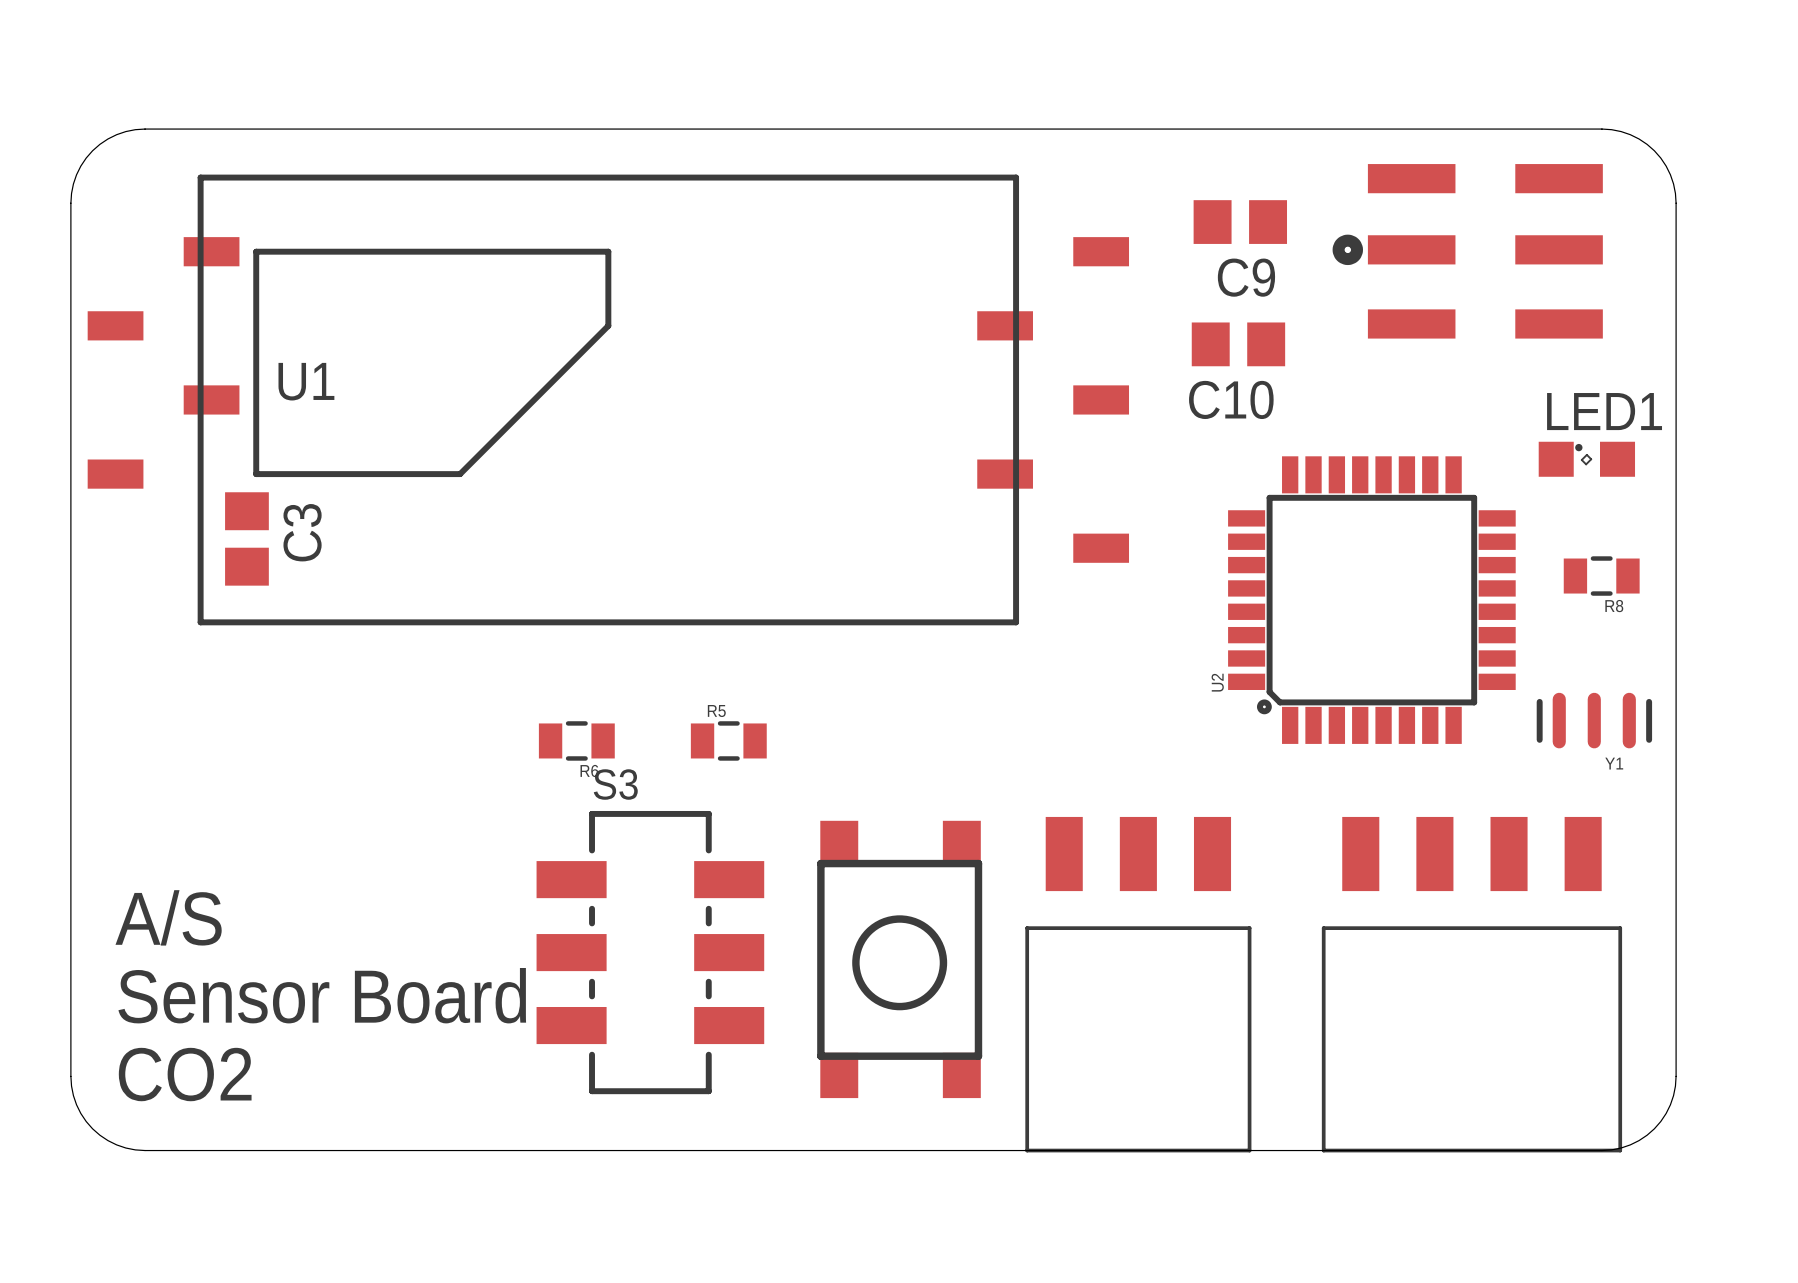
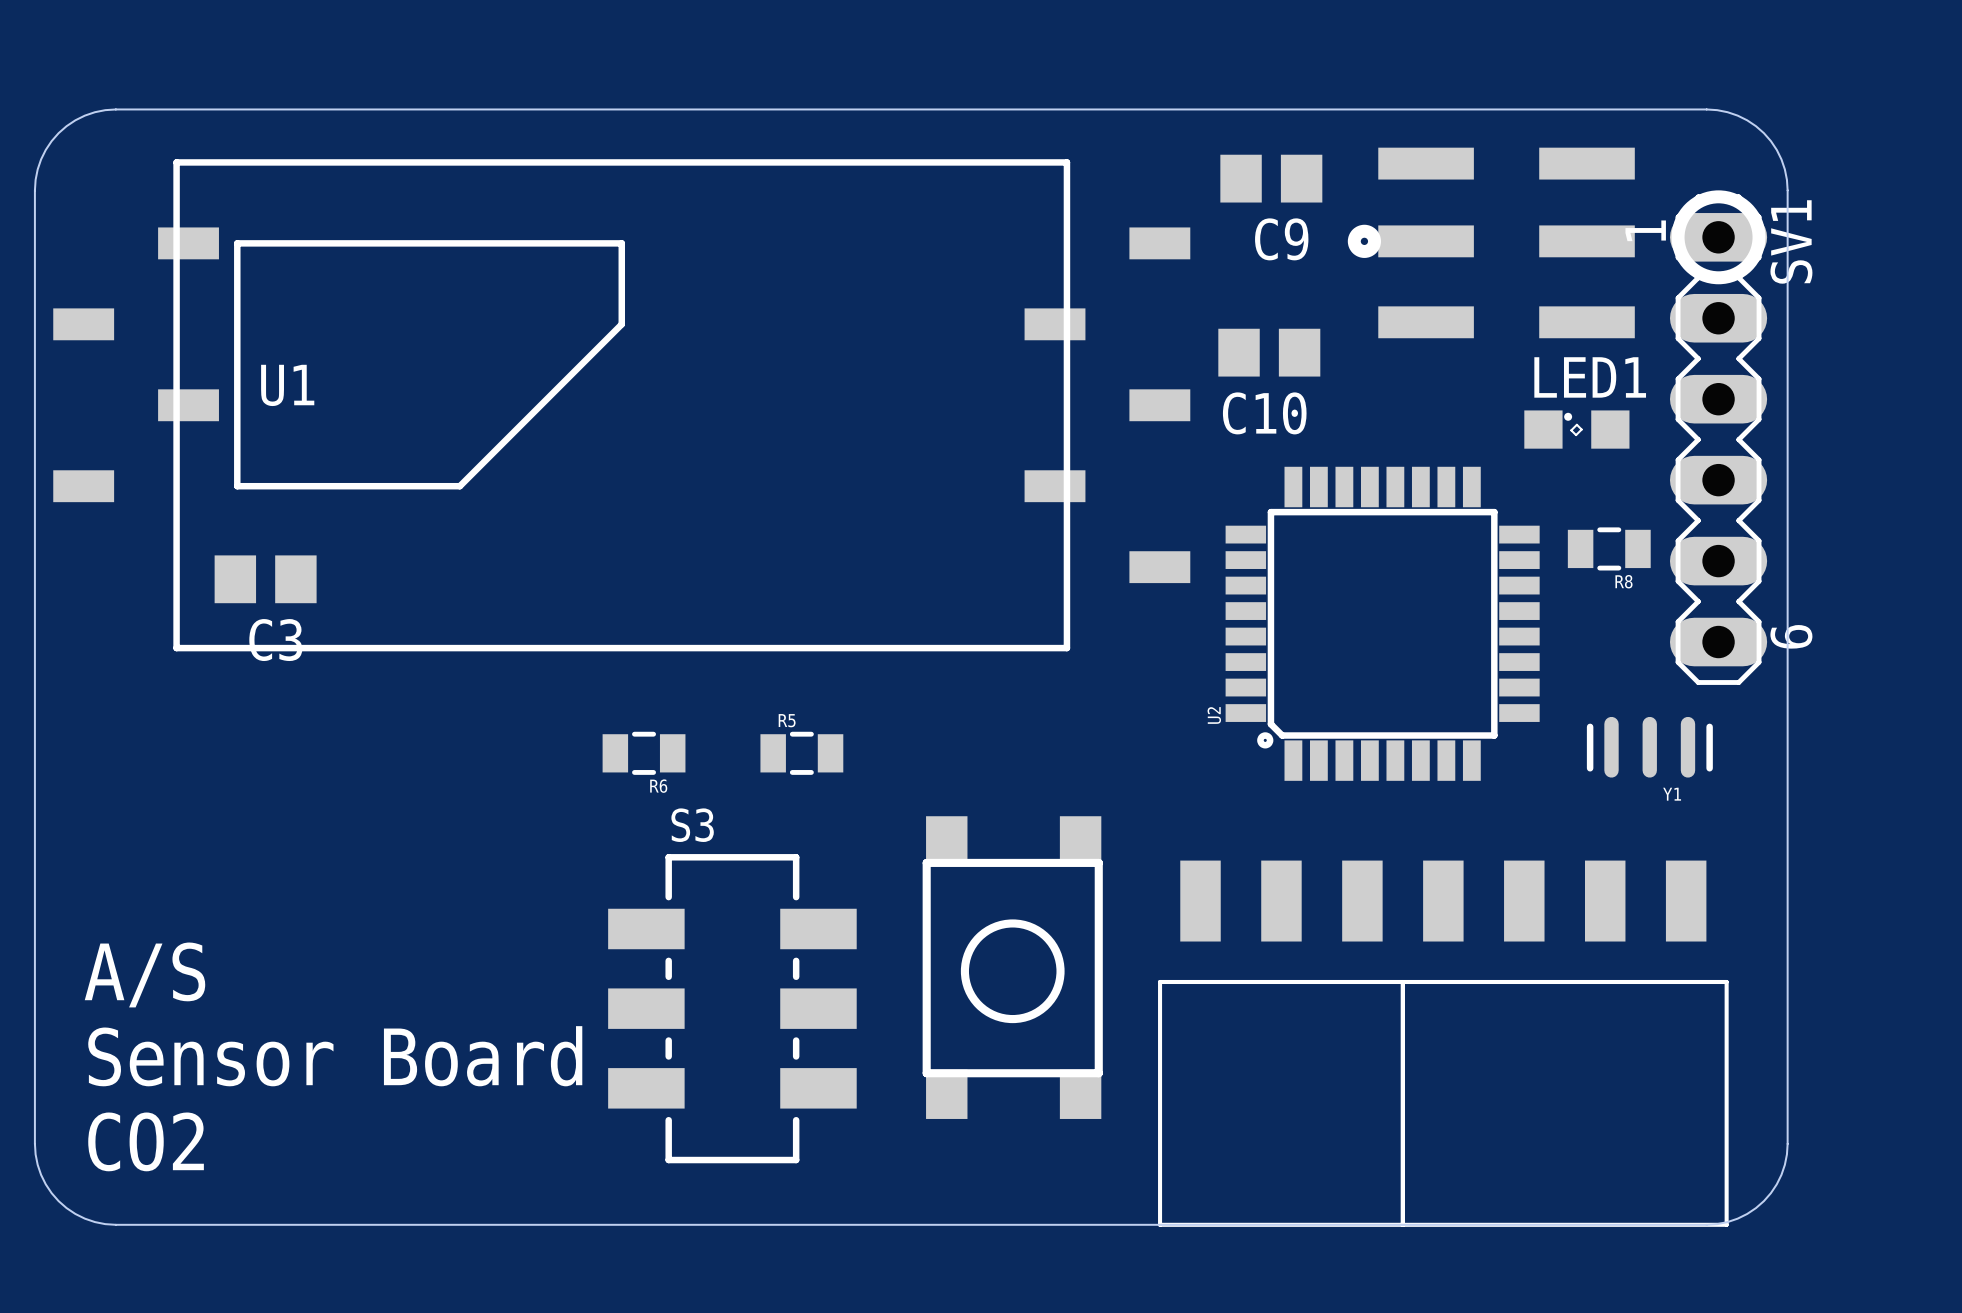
drawing: none -> [1671, 190, 1766, 285]
C9 position: (1240, 222) -> (1271, 178)
drawing position: (1347, 249) -> (1364, 241)
part position: (1485, 251) -> (1506, 242)
C10 position: (1238, 344) -> (1269, 352)
SV1: none -> (1718, 439)
LED1 position: (1586, 459) -> (1576, 429)
C3 rotation: 0° (246, 538) -> 90° clockwise (265, 579)
R8 position: (1601, 576) -> (1609, 548)
U2 position: (1371, 600) -> (1382, 623)
Y1 position: (1594, 720) -> (1649, 747)
R6 position: (576, 740) -> (644, 753)
R5 position: (728, 740) -> (801, 753)
S3 position: (650, 952) -> (732, 1008)
part position: (899, 959) -> (1012, 967)
part position: (1138, 984) -> (1281, 1043)

